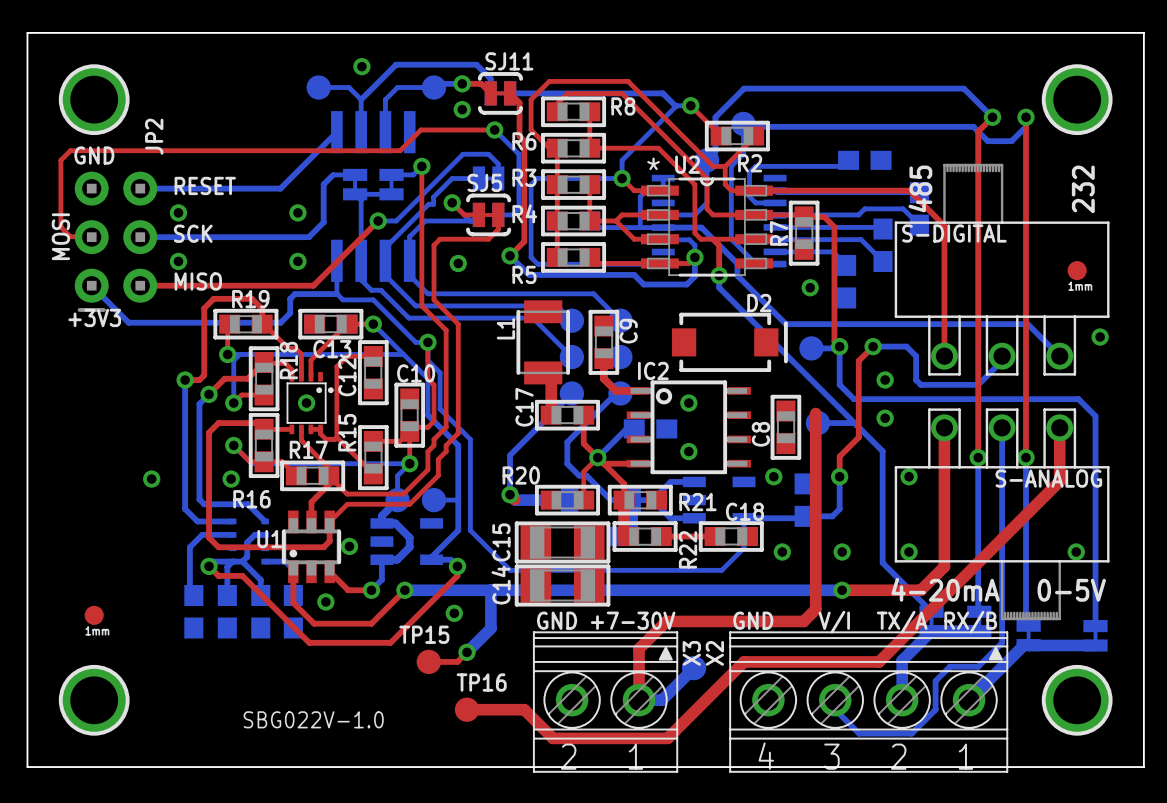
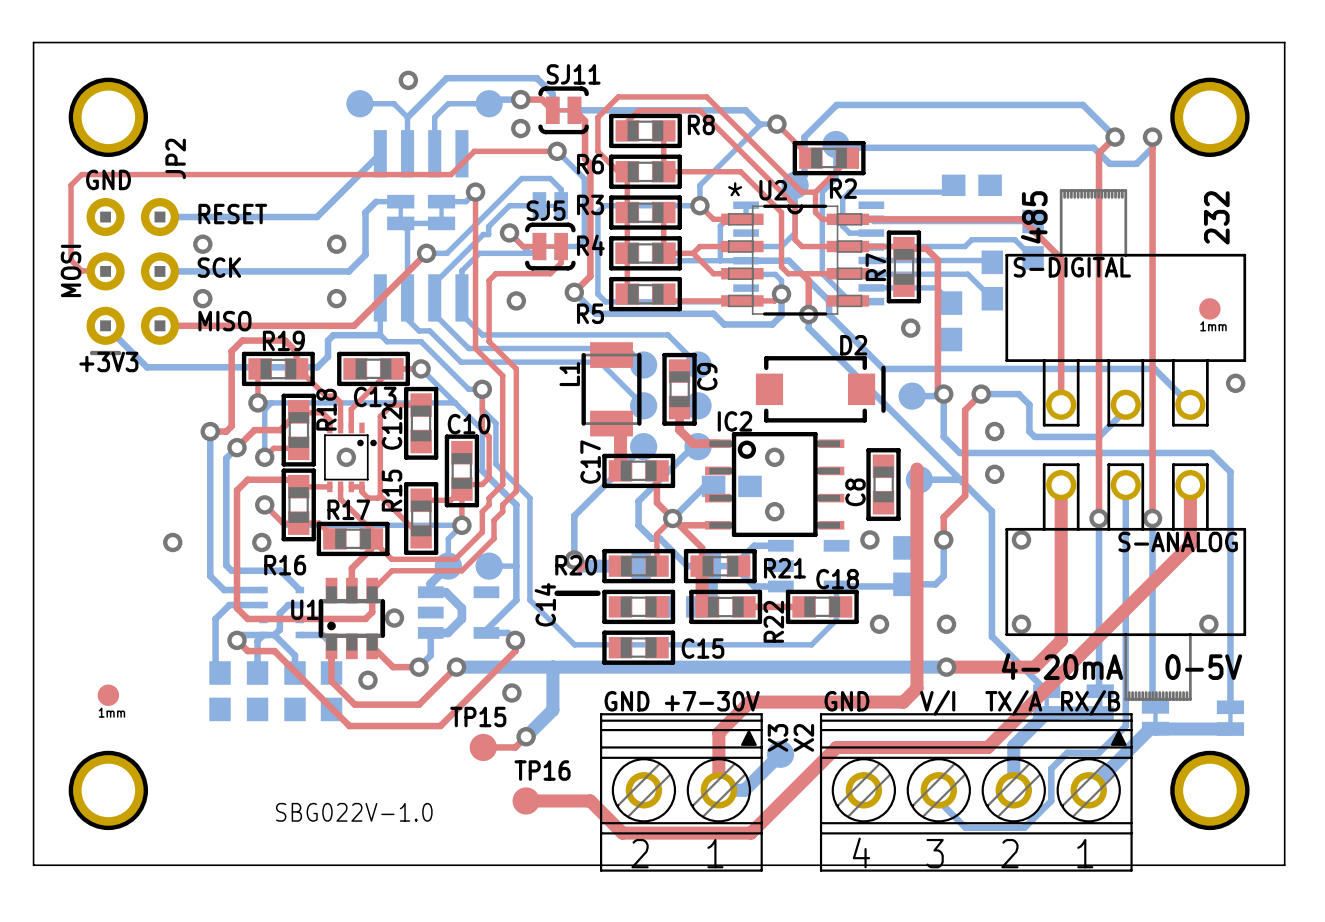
R20 name position: R20 (521, 475) -> R20 (576, 565)
C15 footprint: [514, 521, 611, 564] -> [602, 630, 676, 665]
line: none -> (557, 593) (597, 593)
C15 name position: C15 (501, 542) -> C15 (702, 648)
C14 footprint: [514, 564, 611, 607] -> [602, 589, 676, 625]

